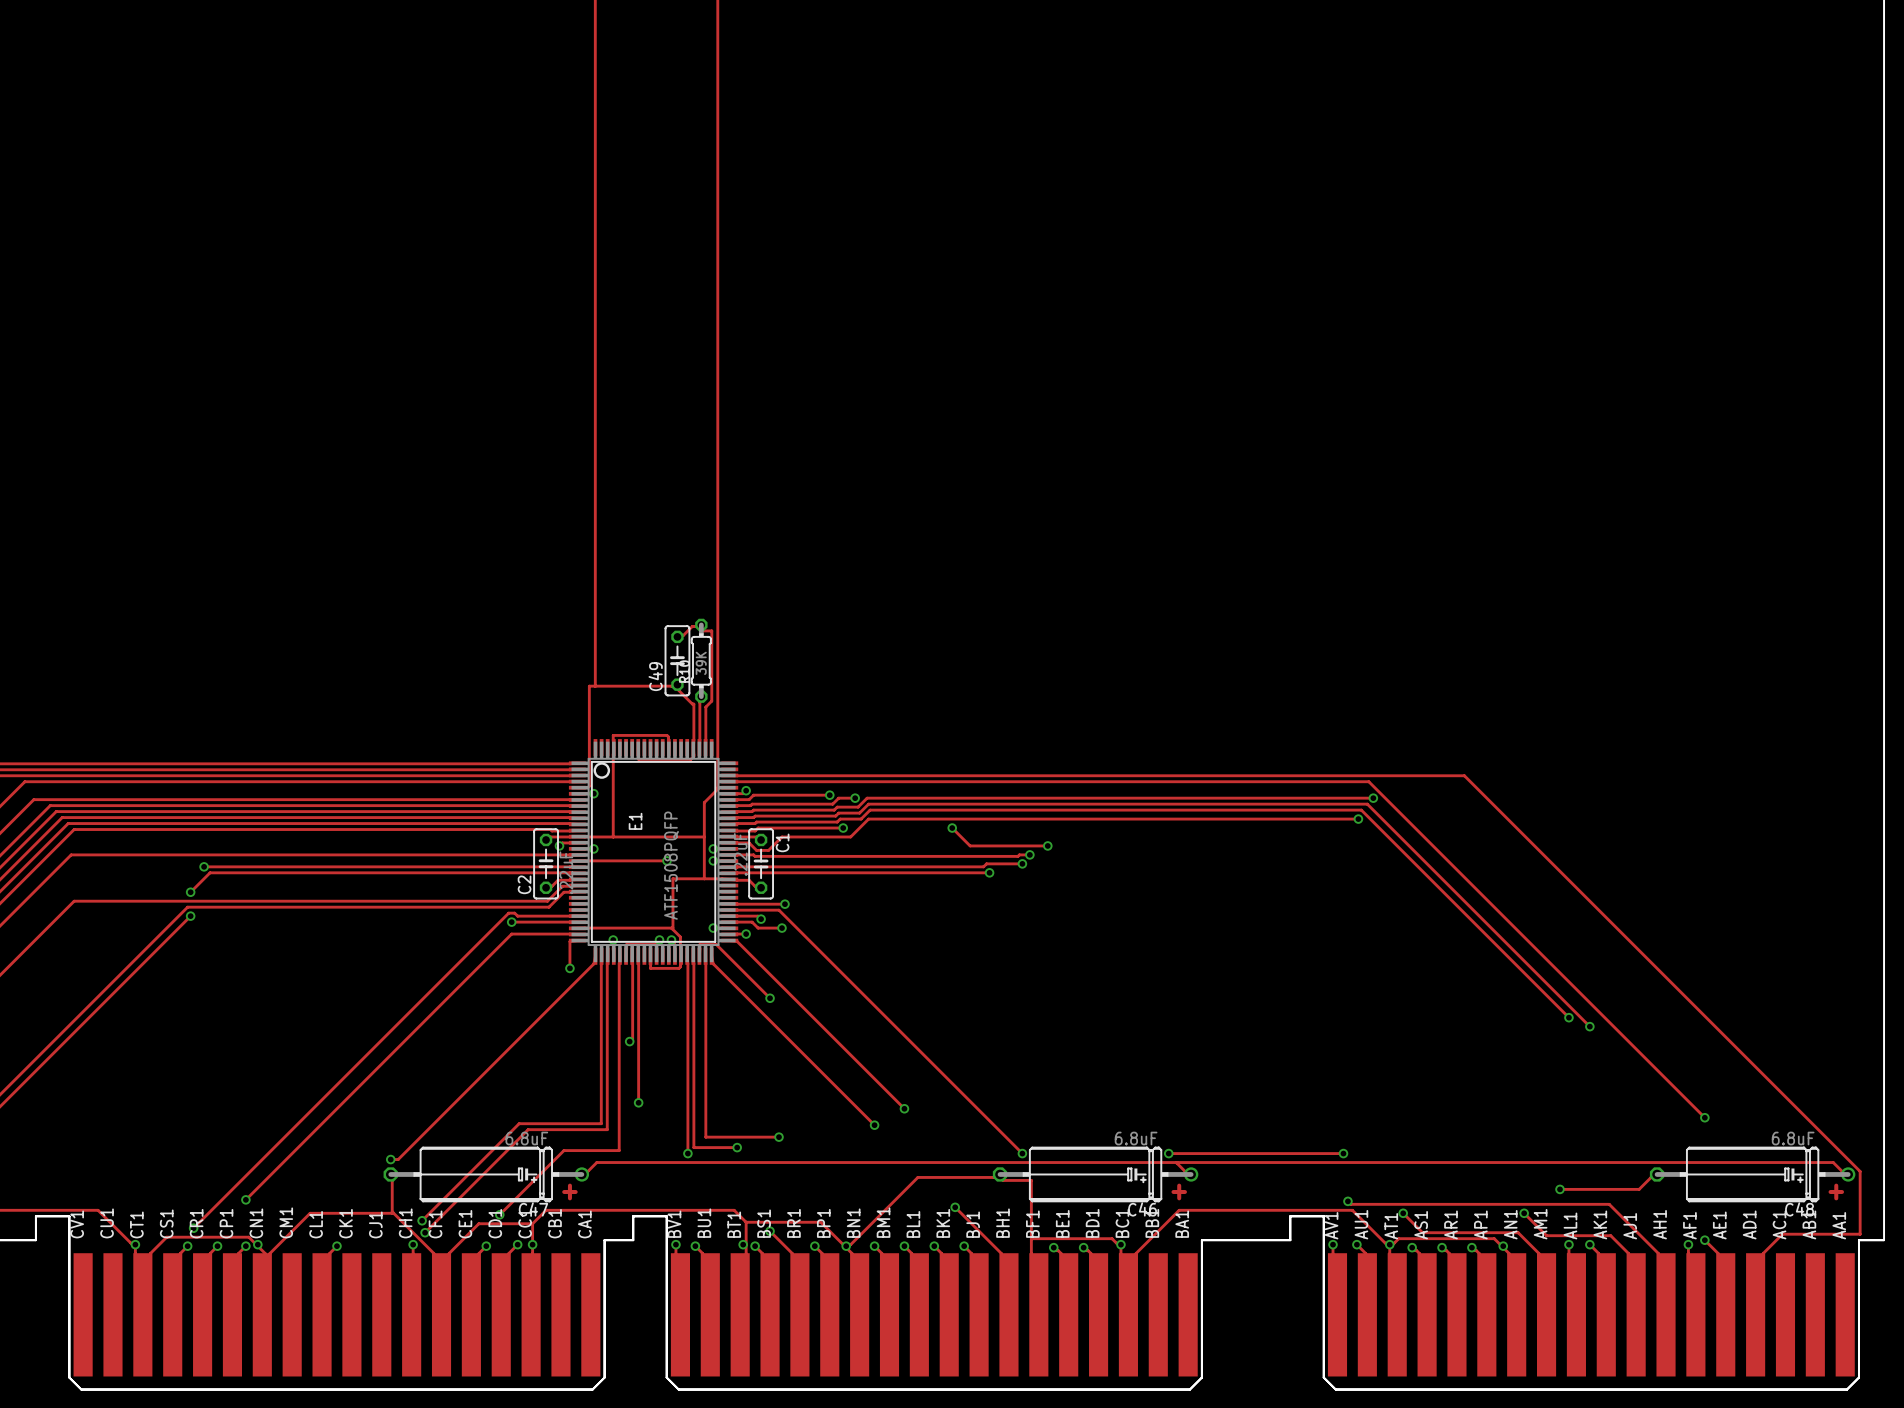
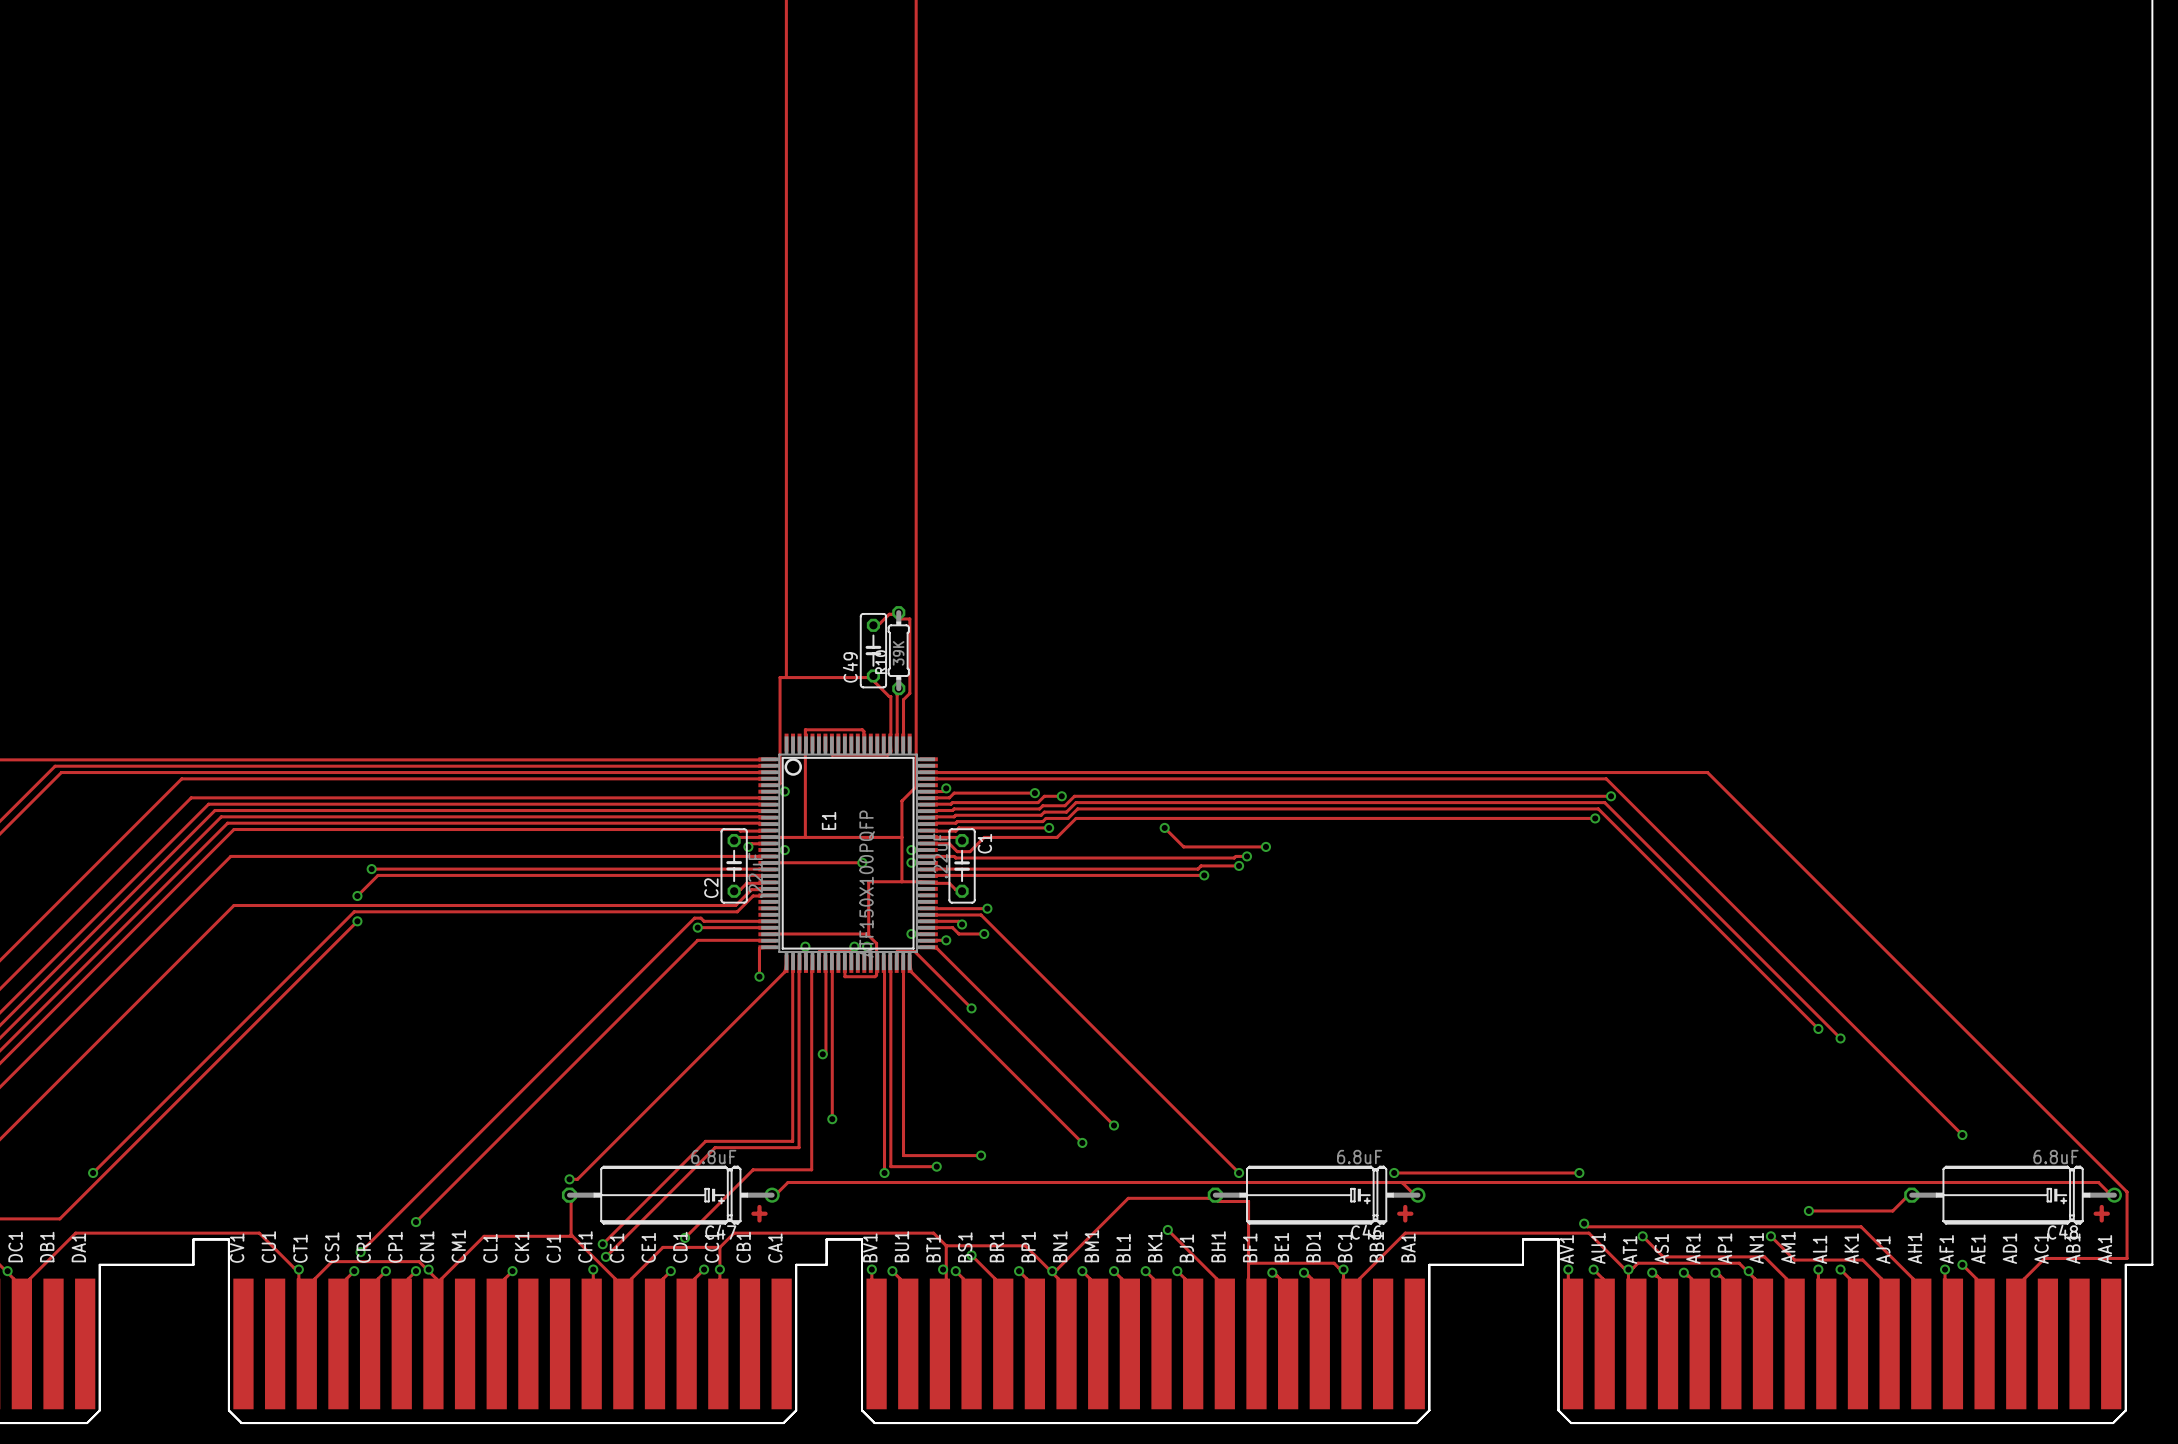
E1 value: ATF1508PQFP (671, 865) -> ATF150X100PQFP (867, 884)

